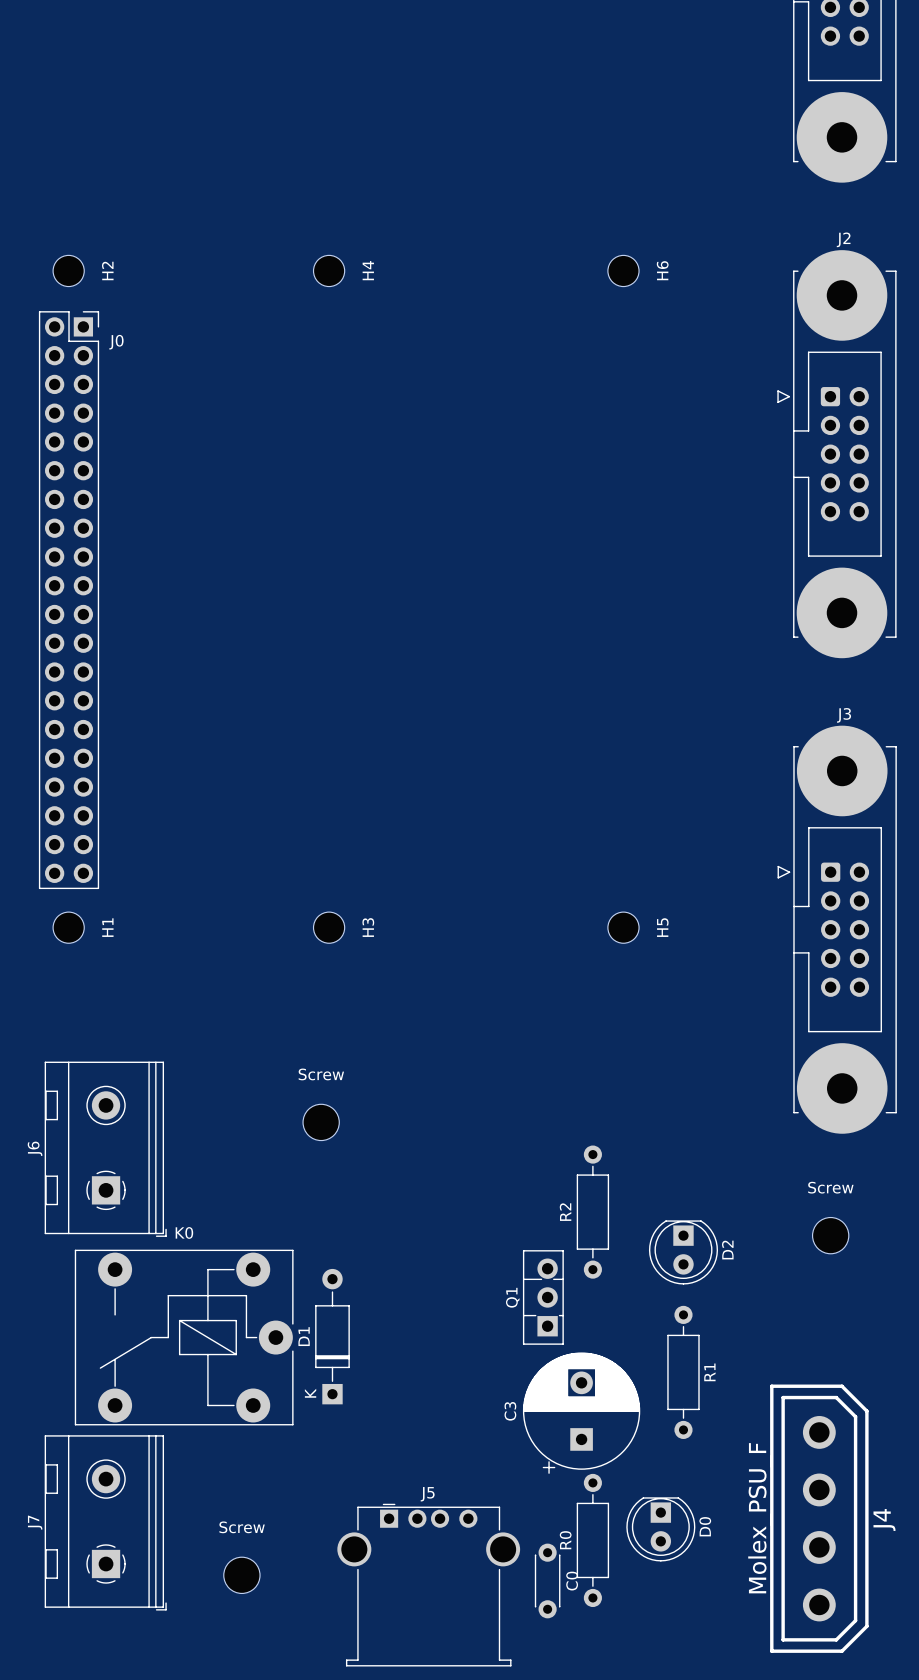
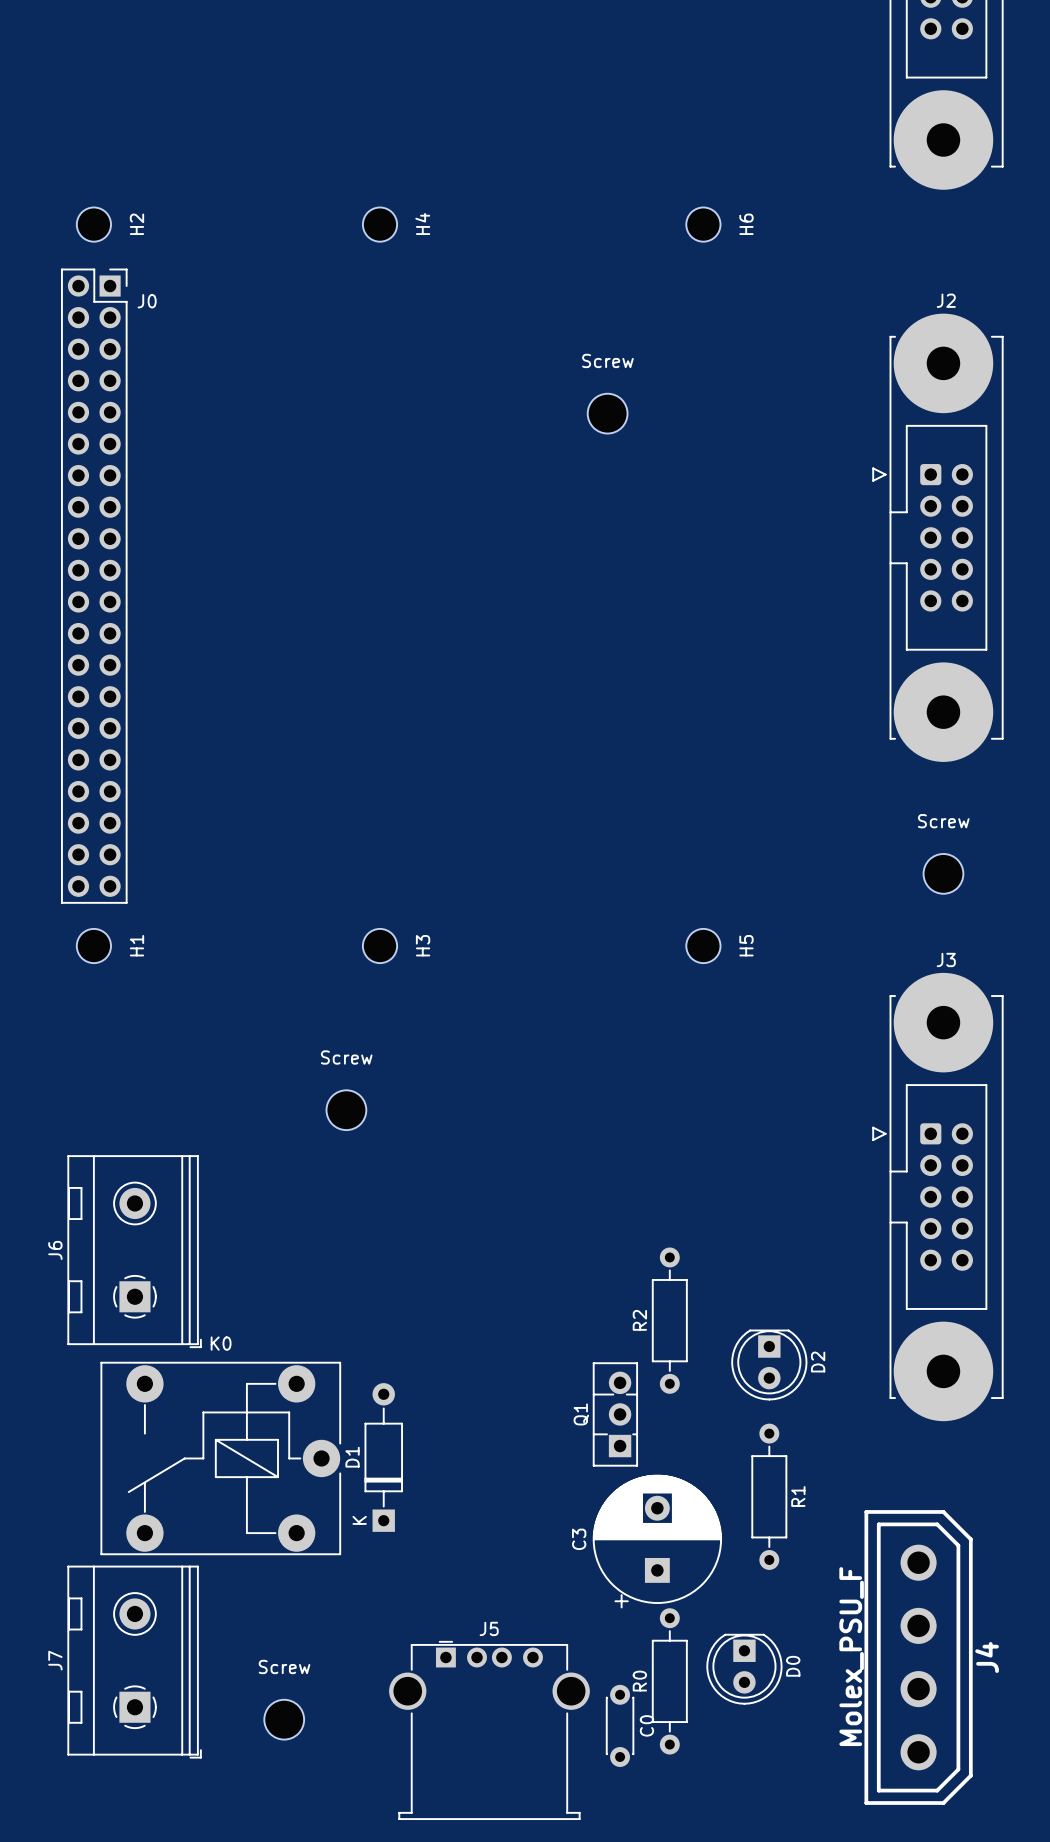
H2 position: (68, 270) -> (93, 224)
H4 position: (329, 270) -> (380, 224)
H6 position: (623, 270) -> (703, 224)
Screw: none -> (607, 413)
J2 position: (836, 454) -> (937, 537)
J0 position: (69, 600) -> (94, 586)
Screw: none -> (943, 873)
H1 position: (68, 927) -> (93, 946)
H3 position: (329, 927) -> (380, 946)
H5 position: (623, 927) -> (703, 946)
J3 position: (837, 929) -> (937, 1197)
Screw position: (321, 1122) -> (346, 1110)
Screw: (830, 1235) -> none

